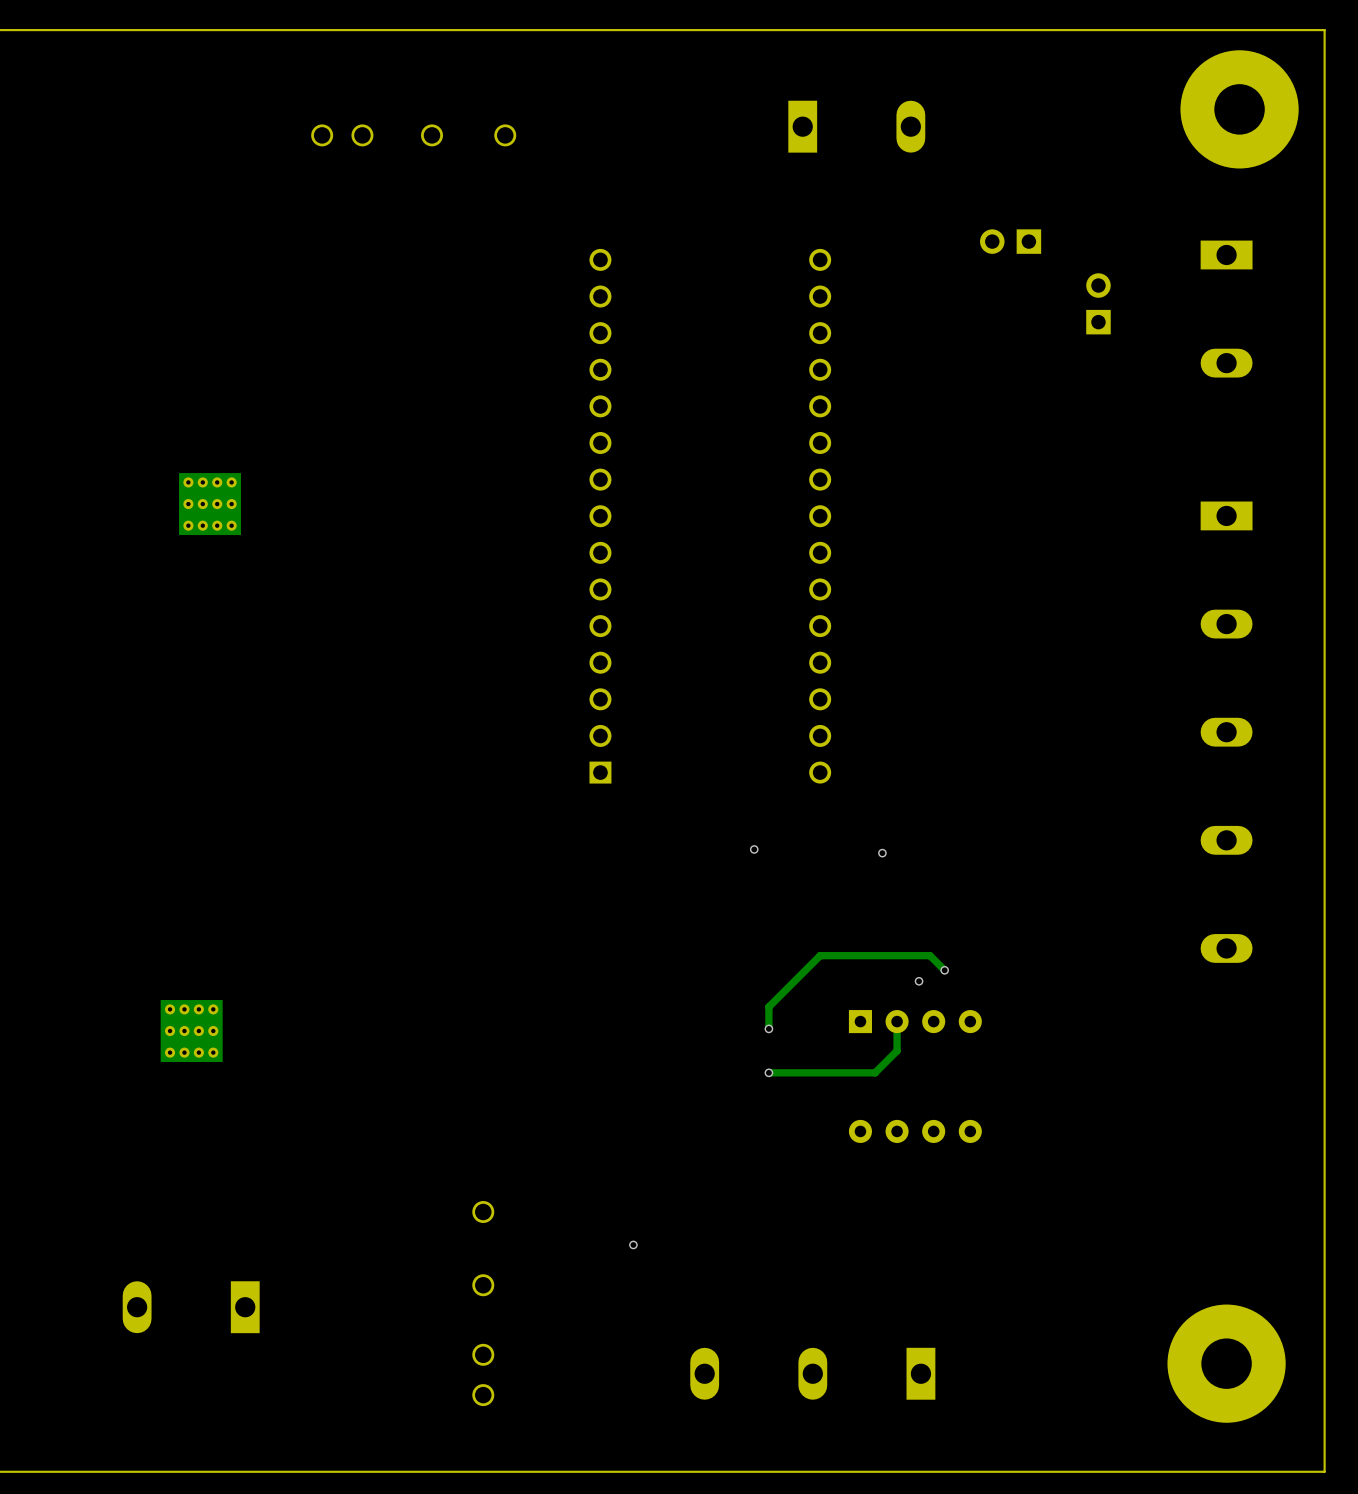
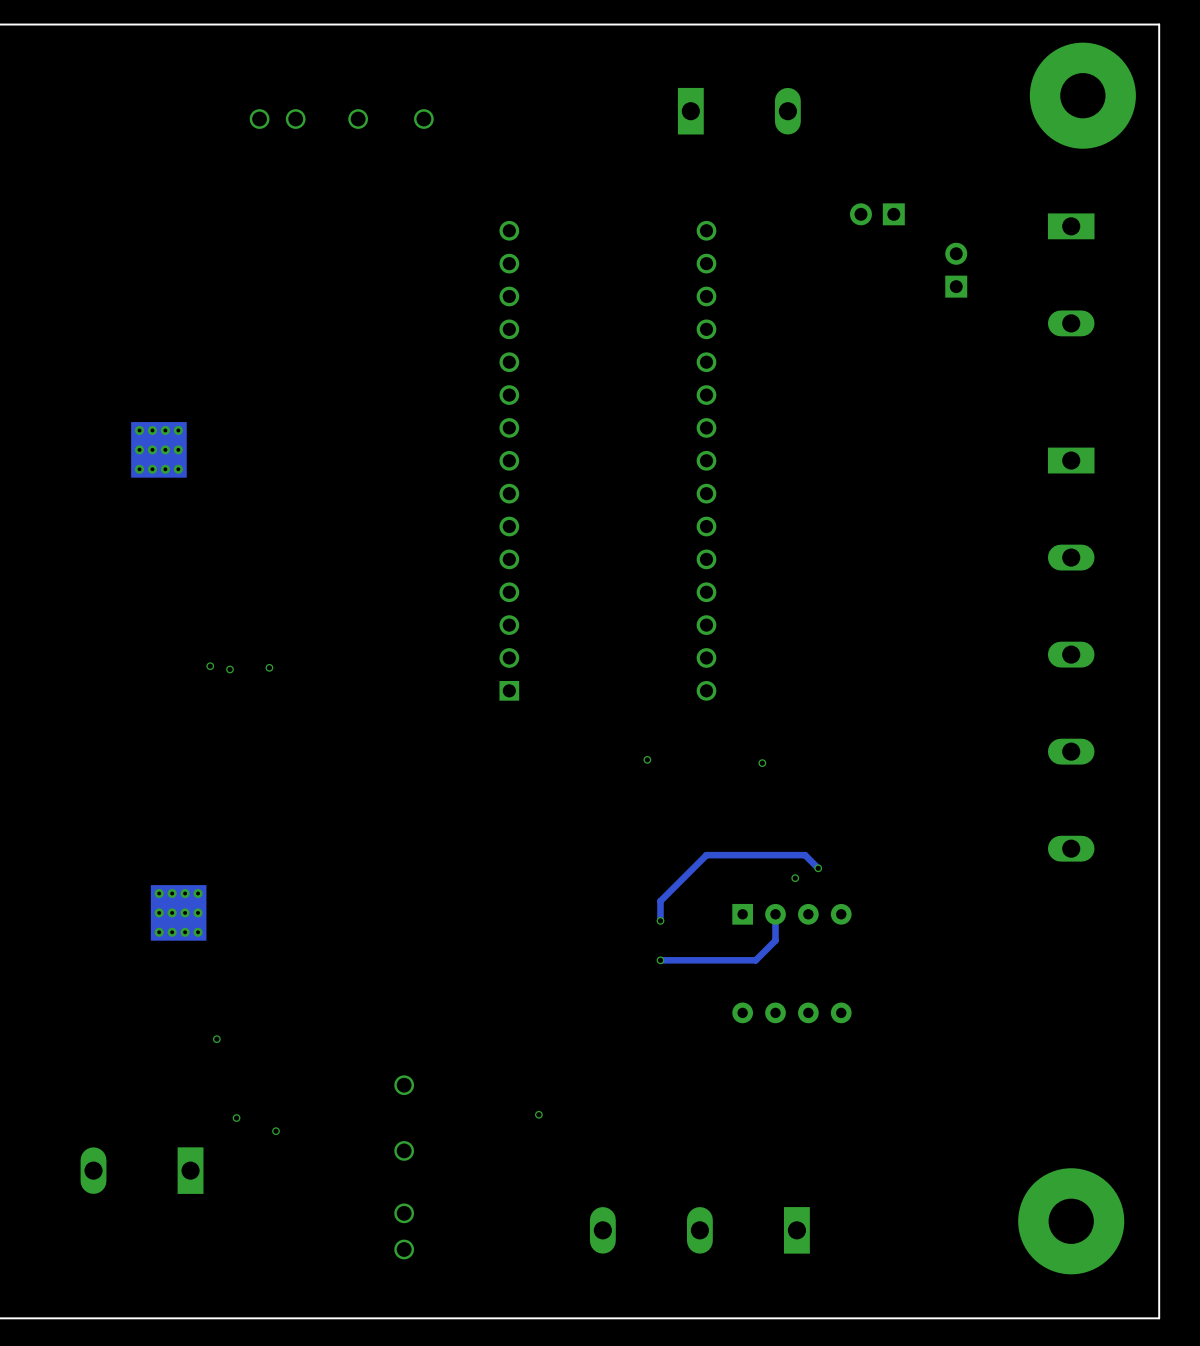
via: none -> (210, 666)
via: none -> (269, 667)
via: none -> (229, 669)
part position: (191, 1031) -> (178, 912)
via: none -> (216, 1039)
via: none -> (236, 1118)
via: none -> (275, 1131)

